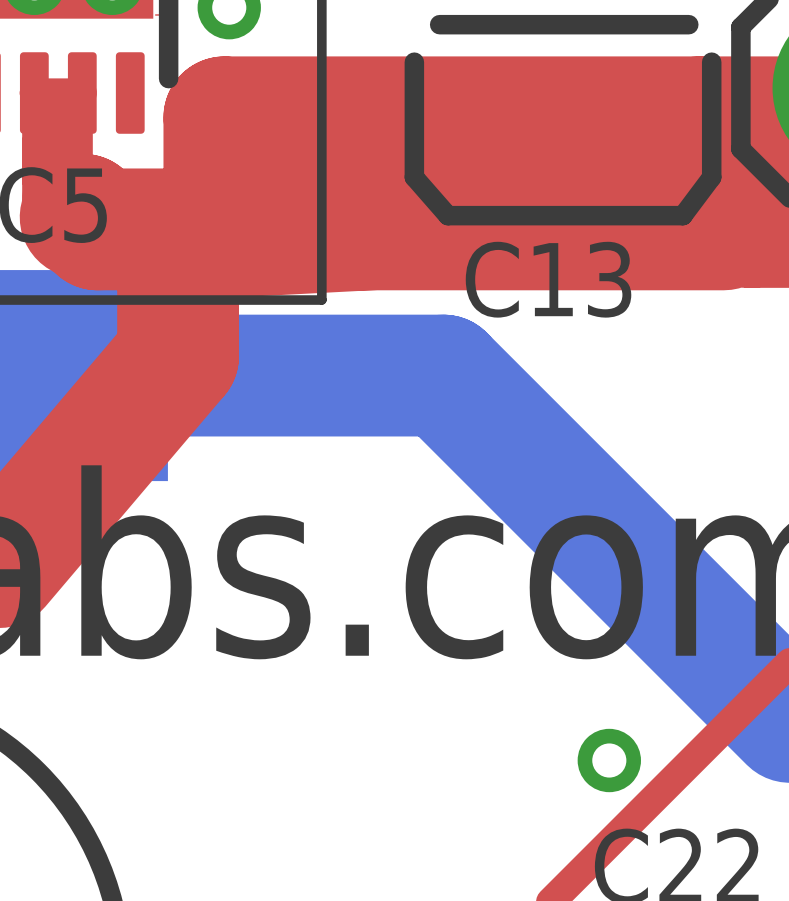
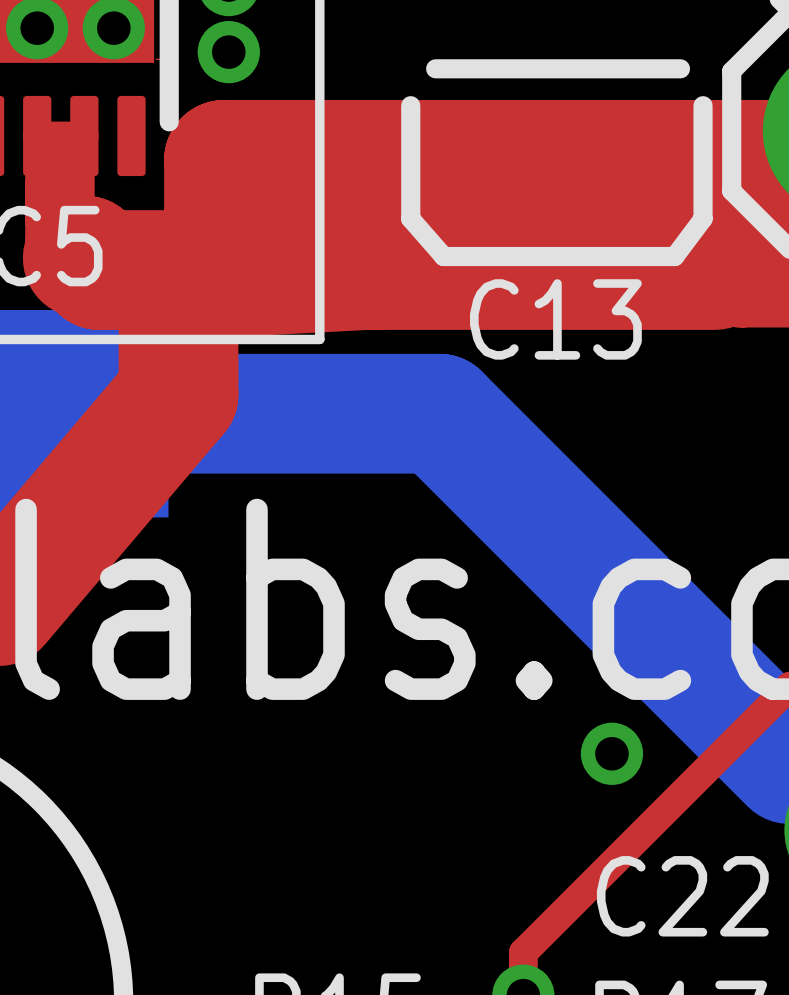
via position: (609, 760) -> (611, 753)

